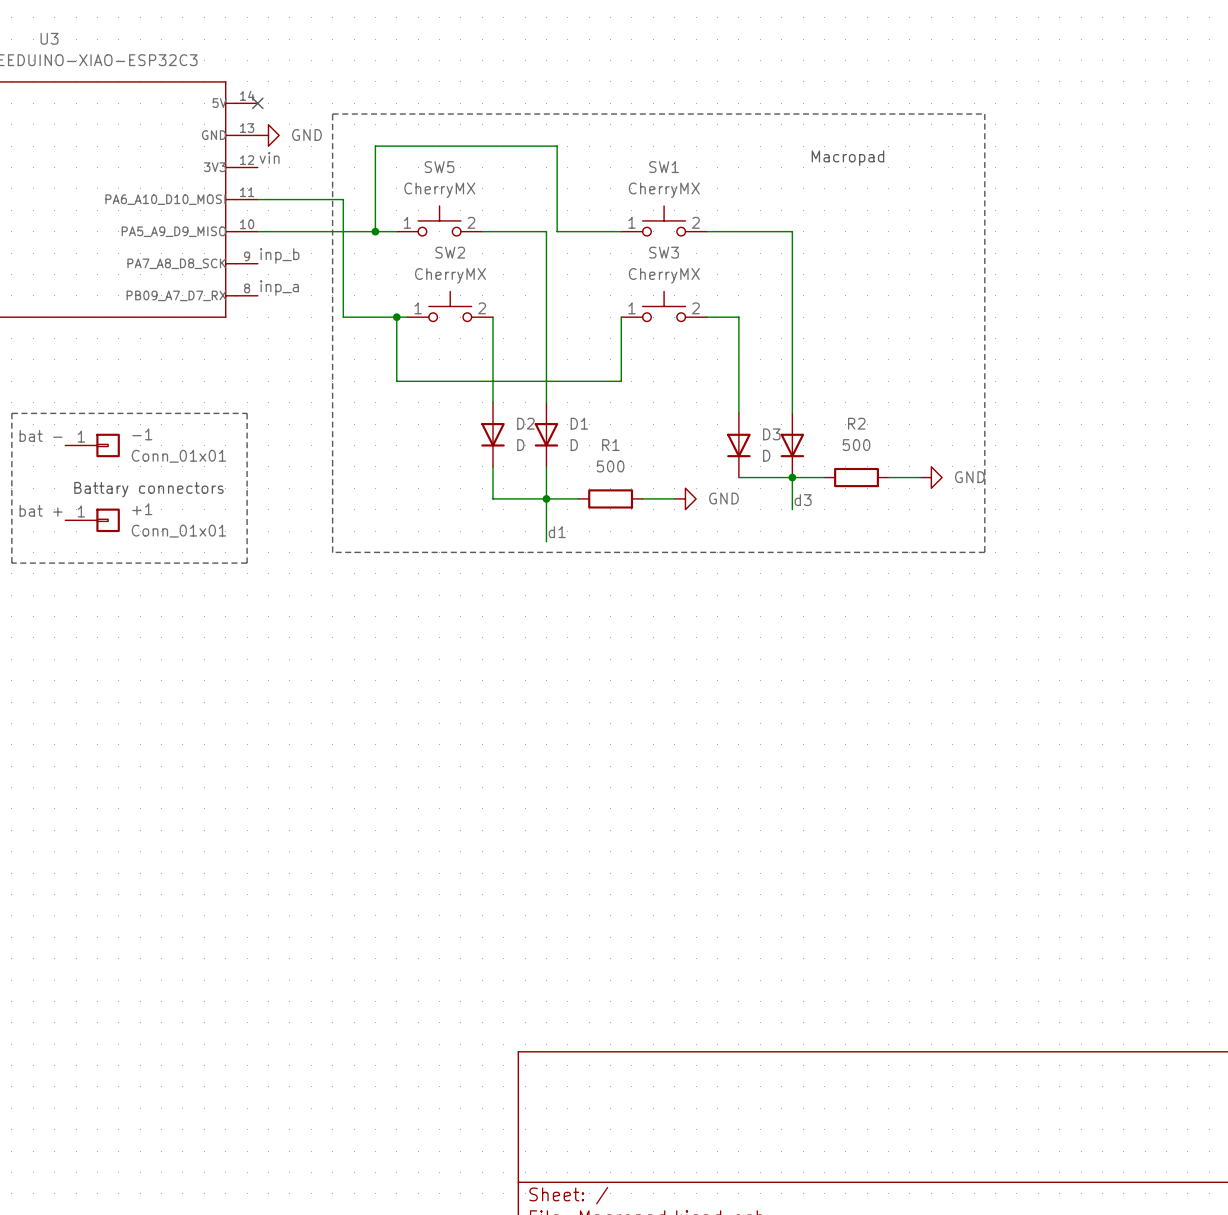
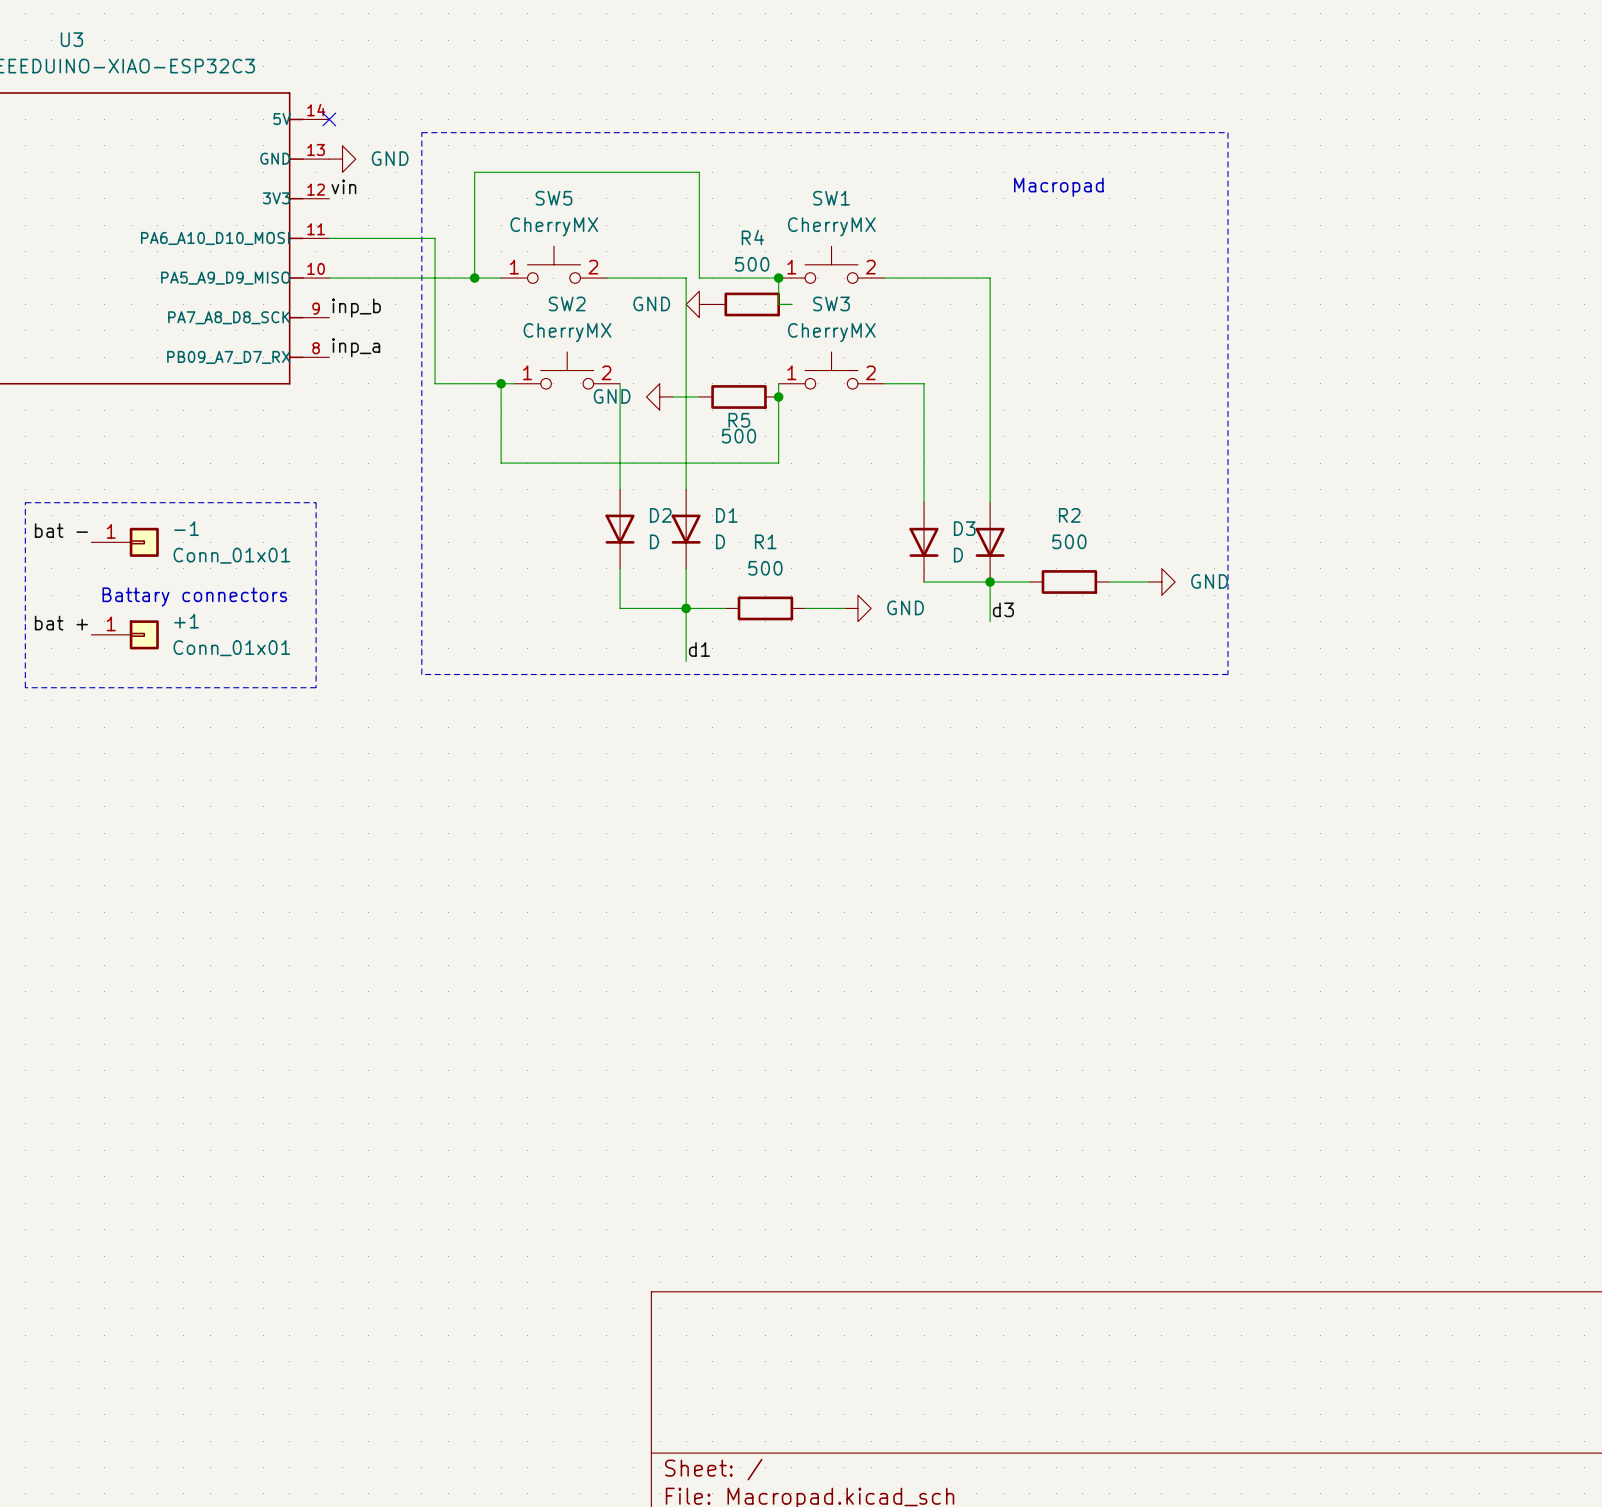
wire: none -> (778, 278) (778, 304) (791, 304)
junction: none -> (778, 278)
power symbol: none -> GND (699, 304)
R4: none -> 500 (752, 304)
power symbol: none -> GND (659, 396)
wire: none -> (672, 396) (699, 396)
R5: none -> 500 (739, 396)
junction: none -> (778, 396)

